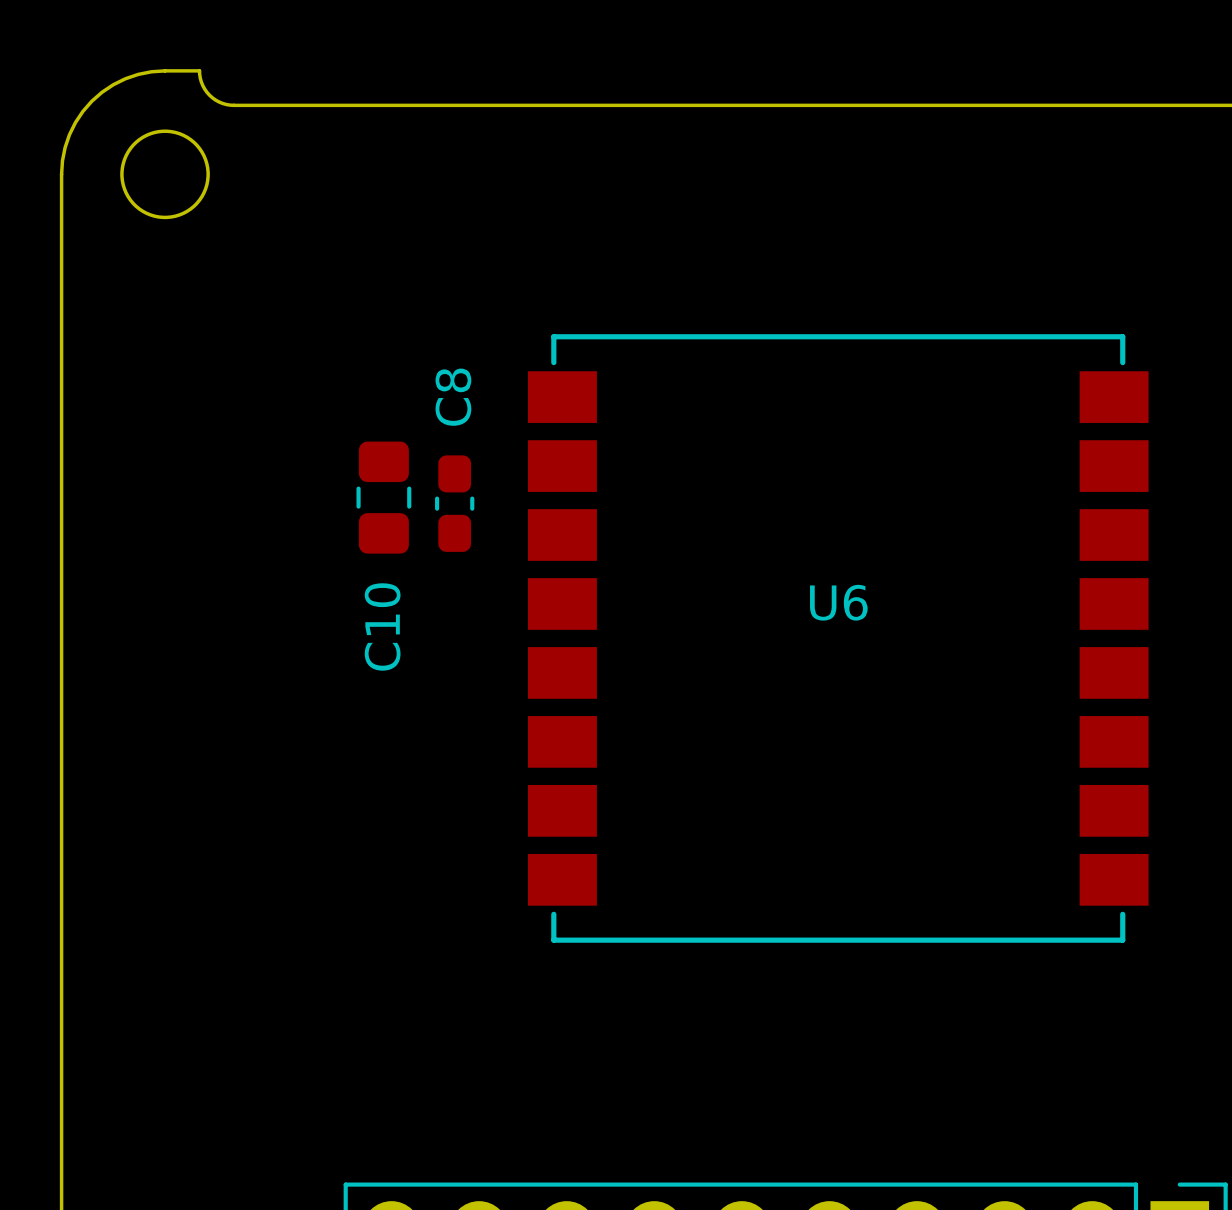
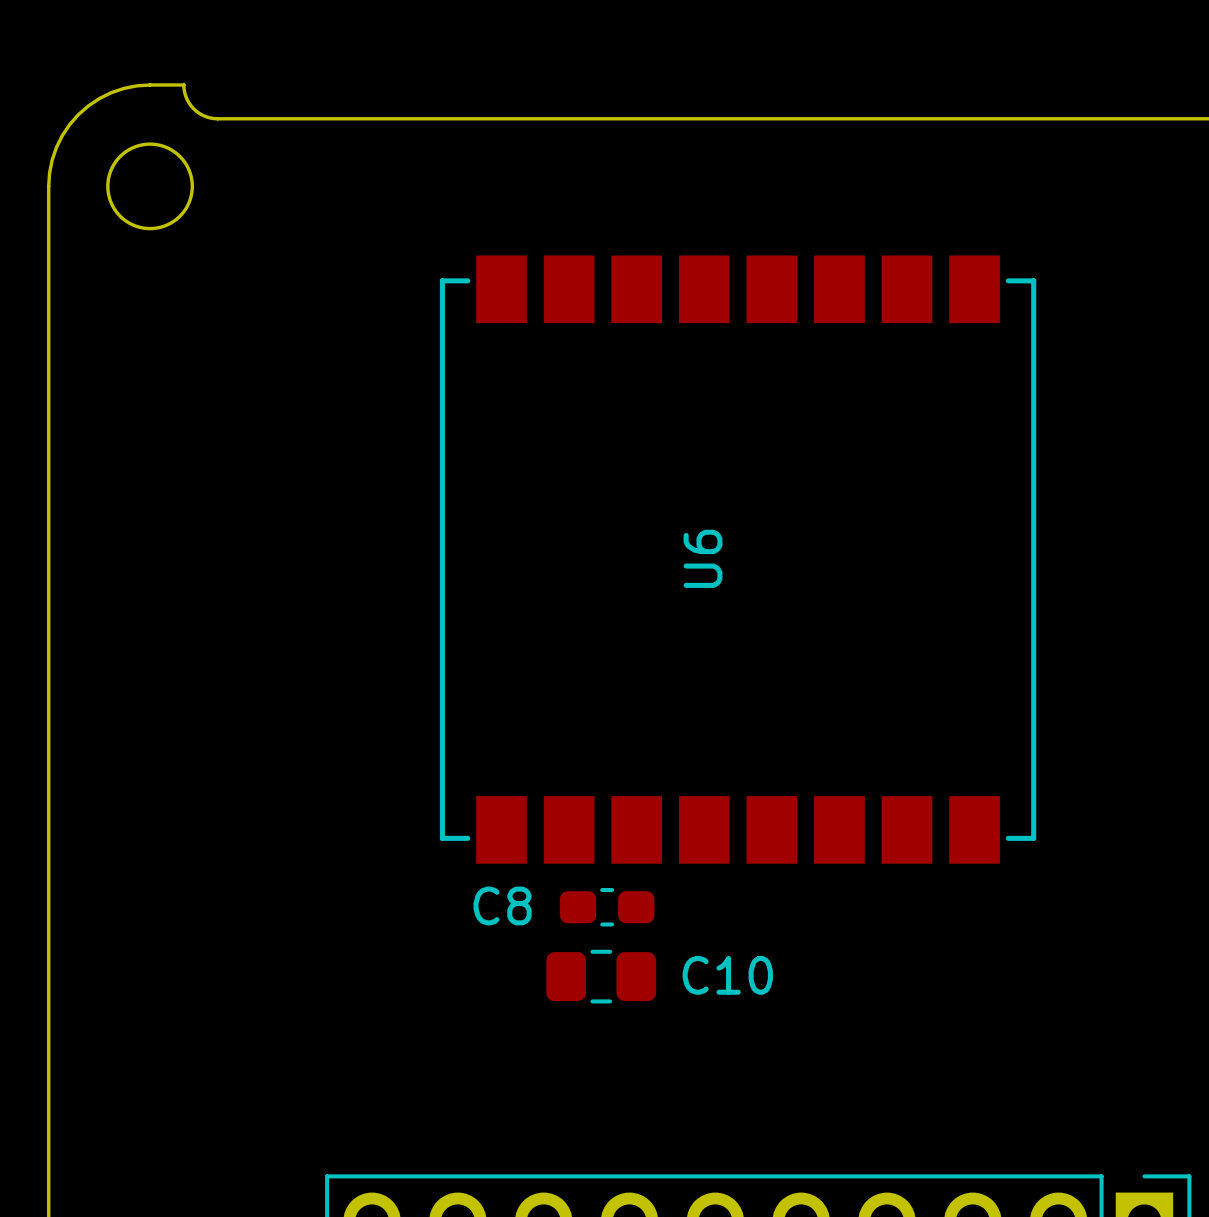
C8 name position: C8 (453, 397) -> C8 (502, 905)
C10 rotation: 0° (383, 497) -> 90° clockwise (601, 976)
C10 position: (383, 497) -> (601, 976)
C8 rotation: 0° (454, 503) -> 90° clockwise (607, 907)
C8 position: (454, 503) -> (607, 907)
C10 name position: C10 (382, 626) -> C10 (727, 975)
U6 rotation: 0° (838, 638) -> 90° clockwise (738, 559)

